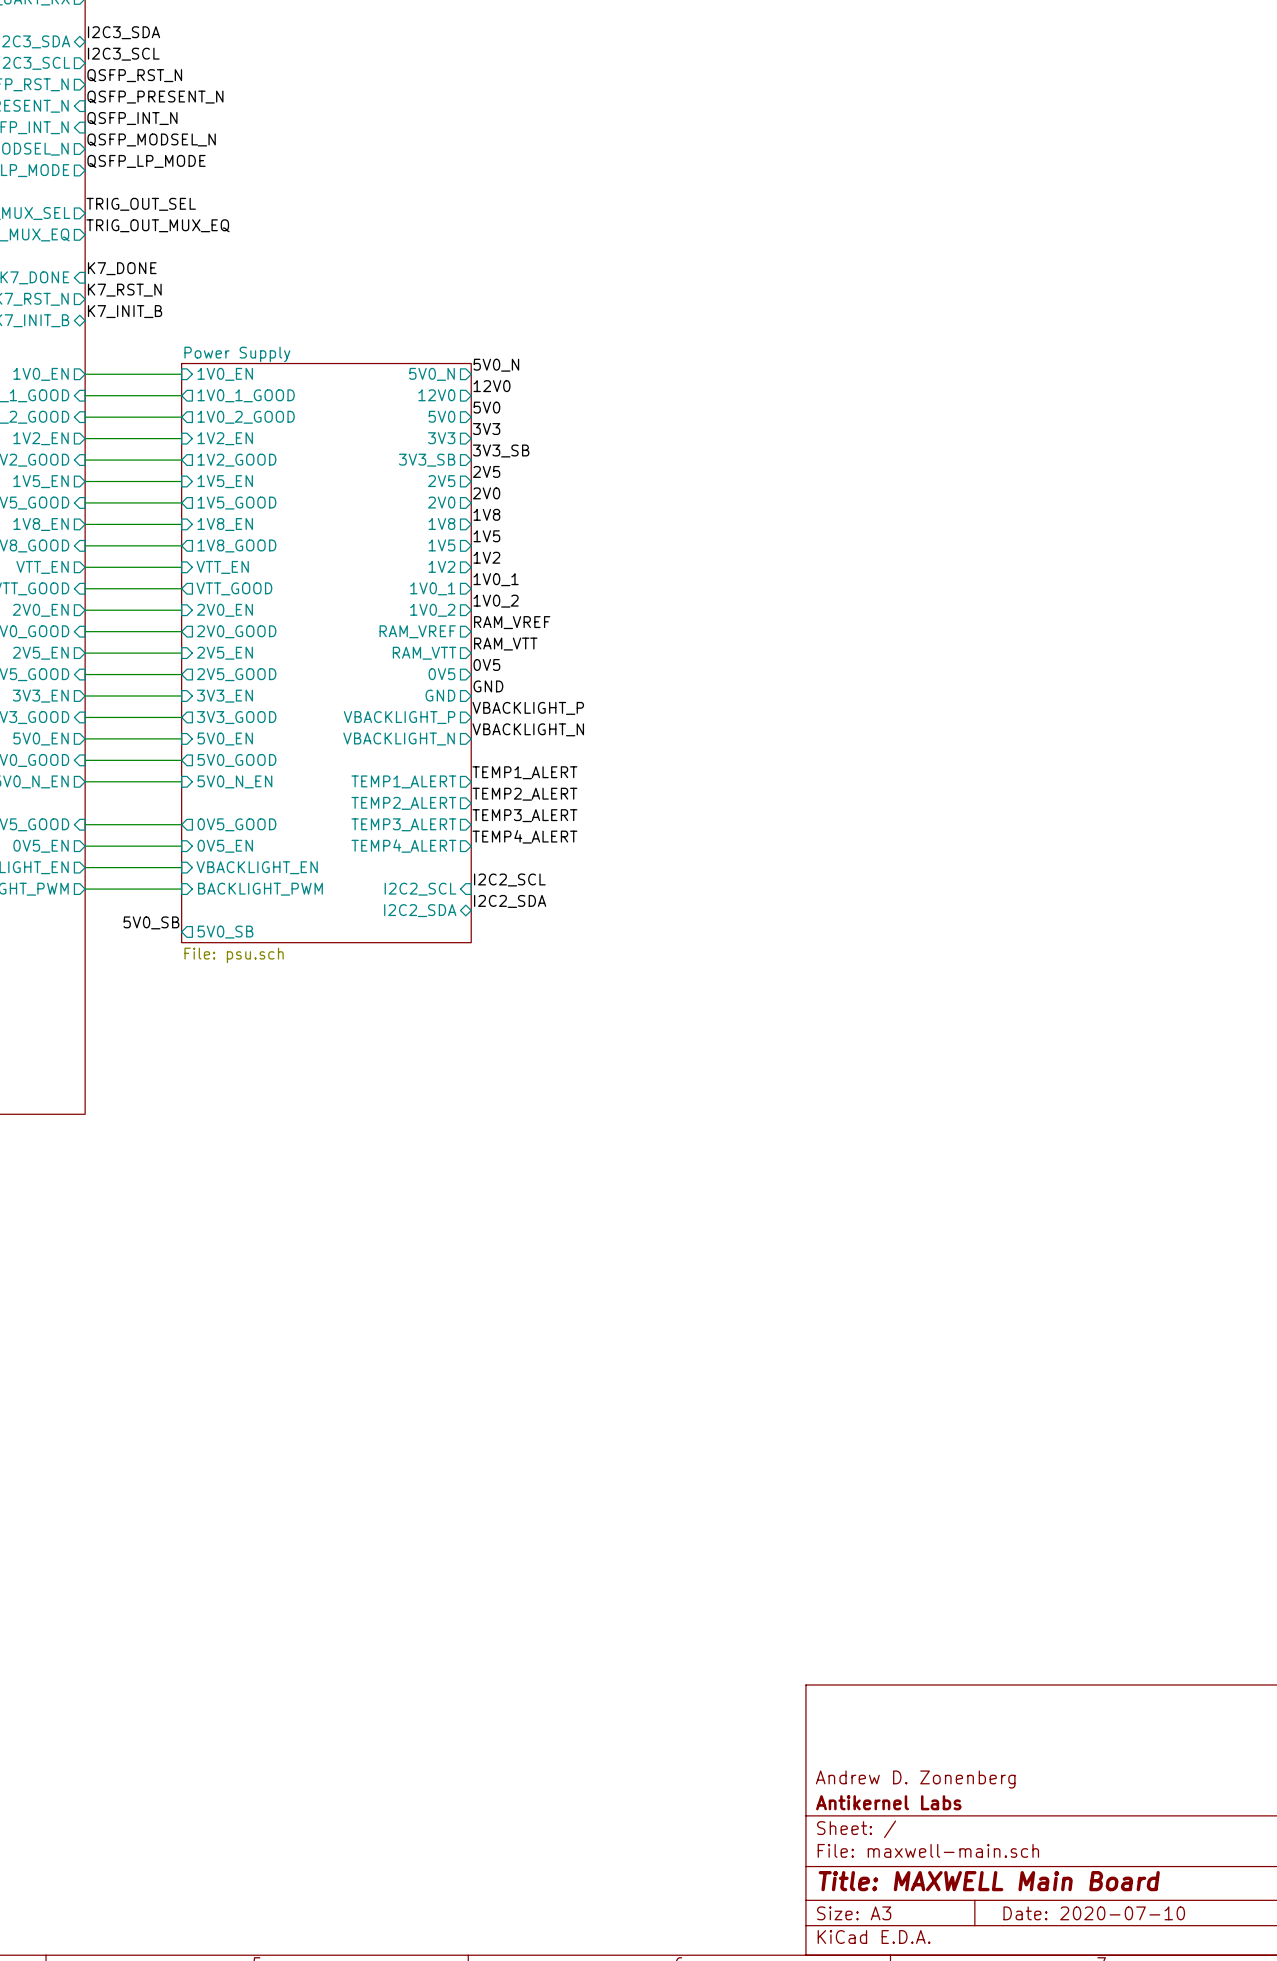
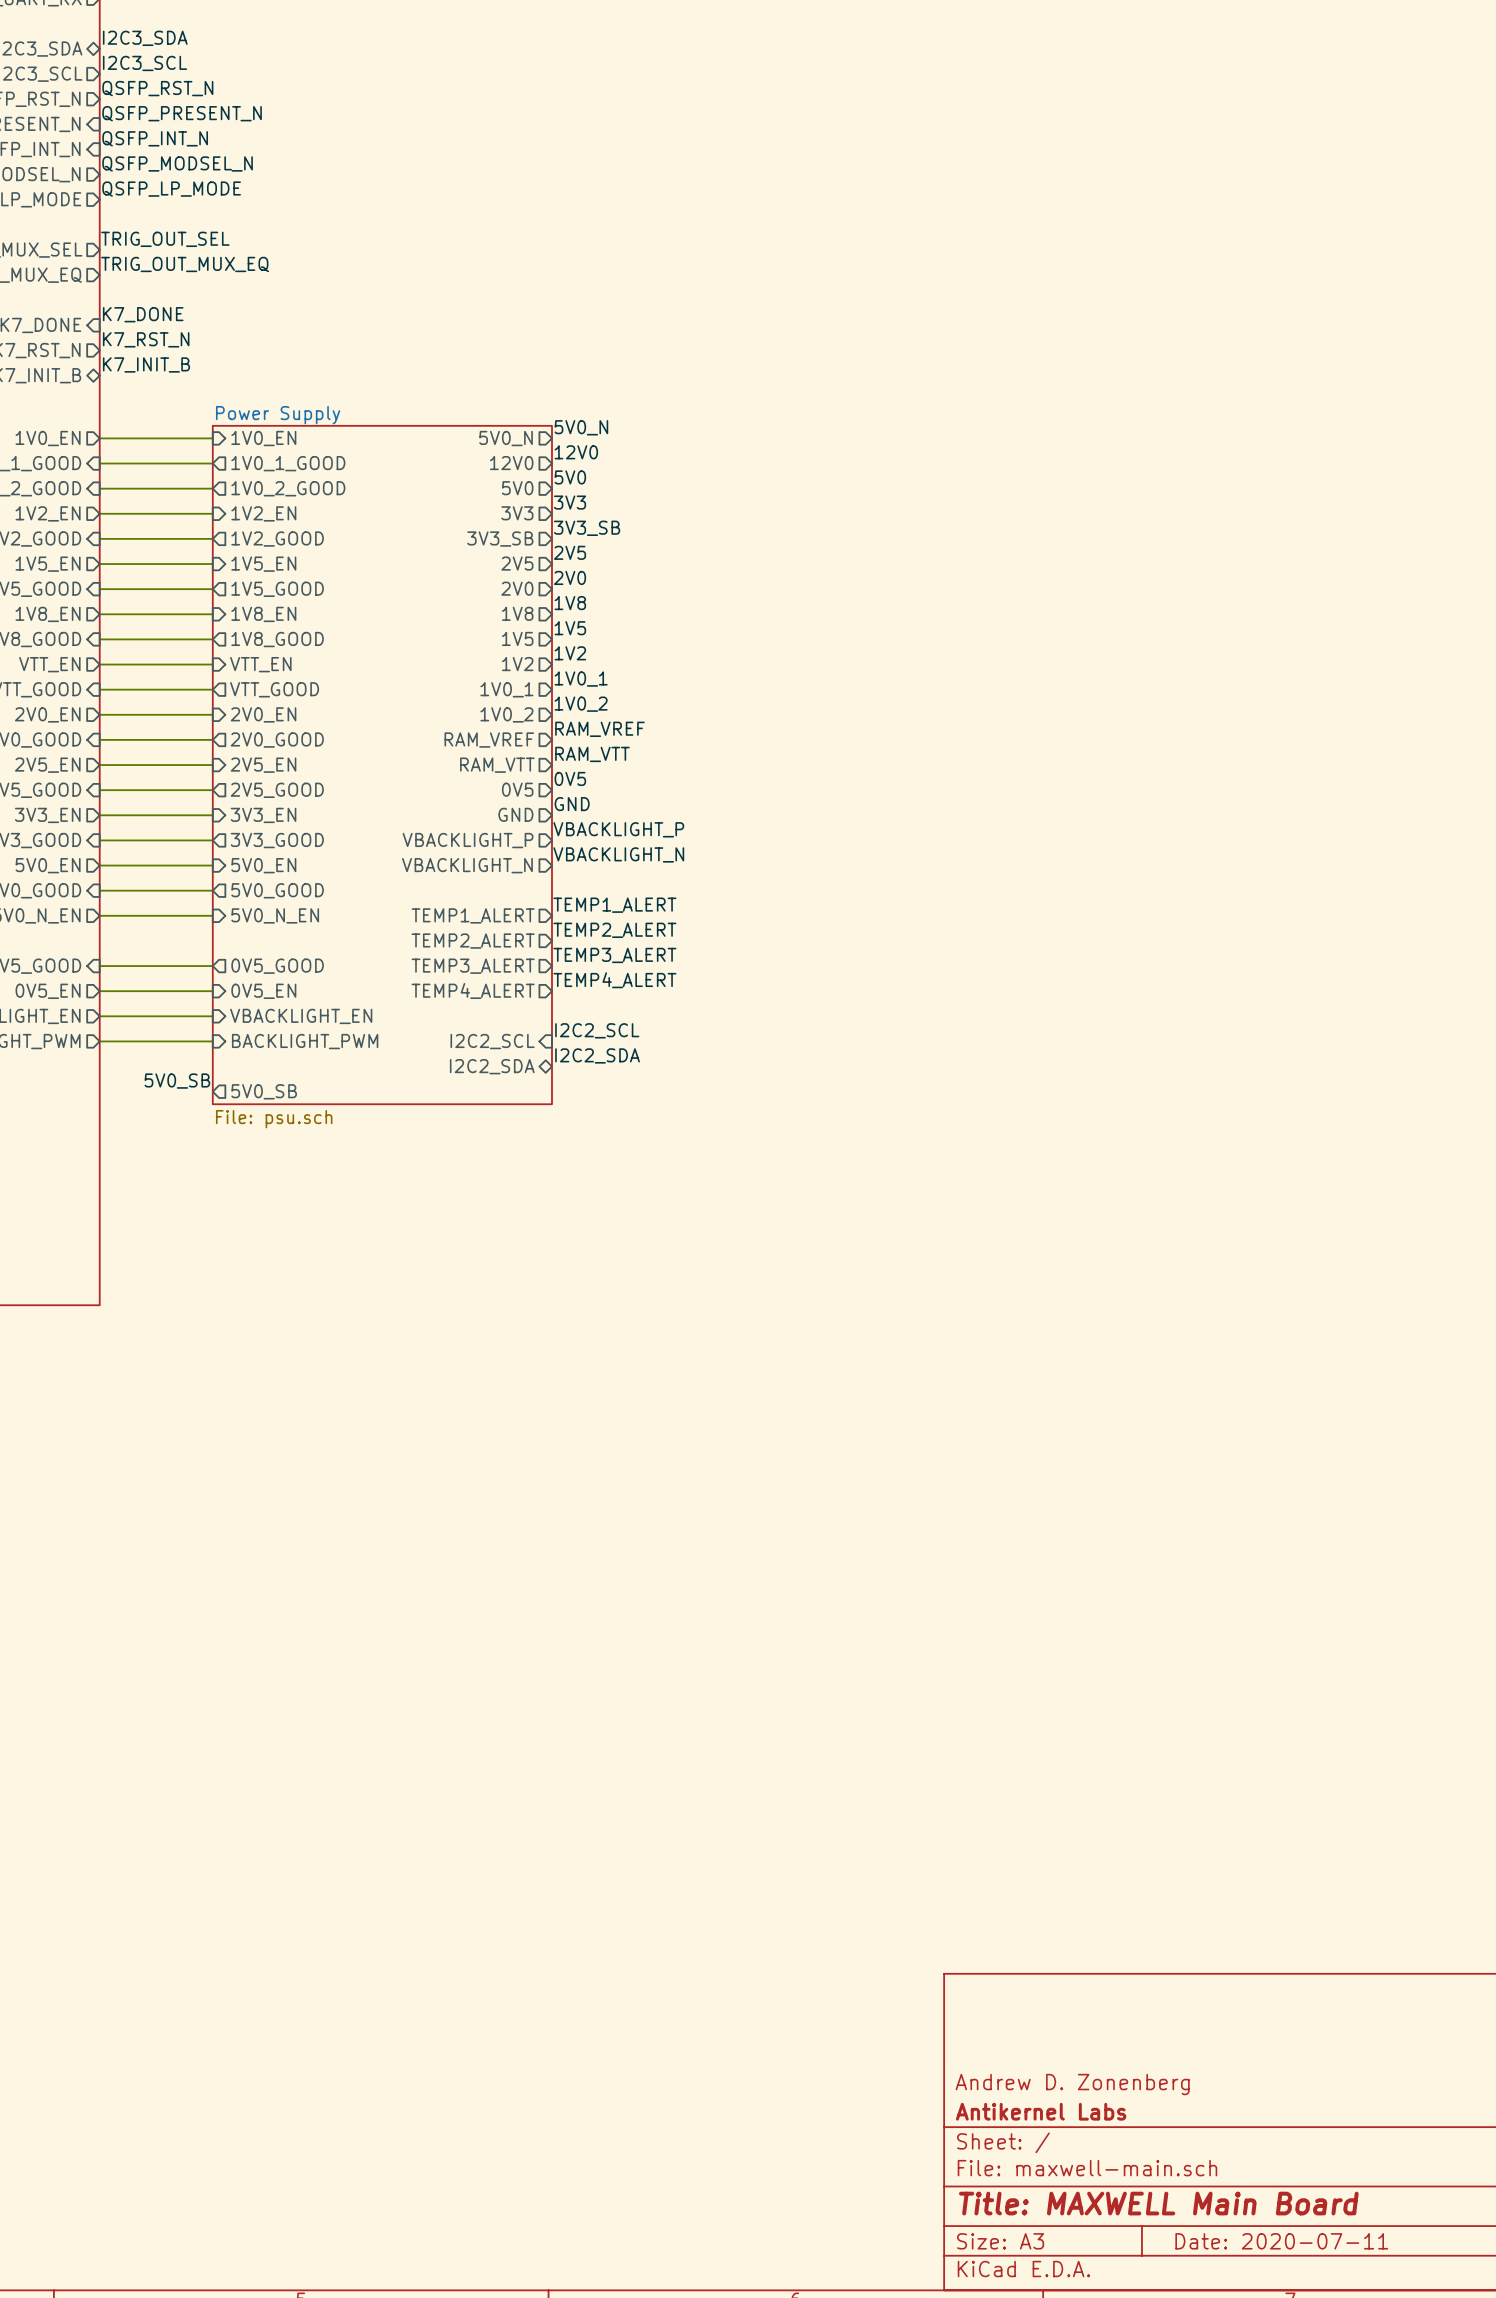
title block: Date: 2020-07-10 (1094, 1913) -> Date: 2020-07-11 (1281, 2241)

